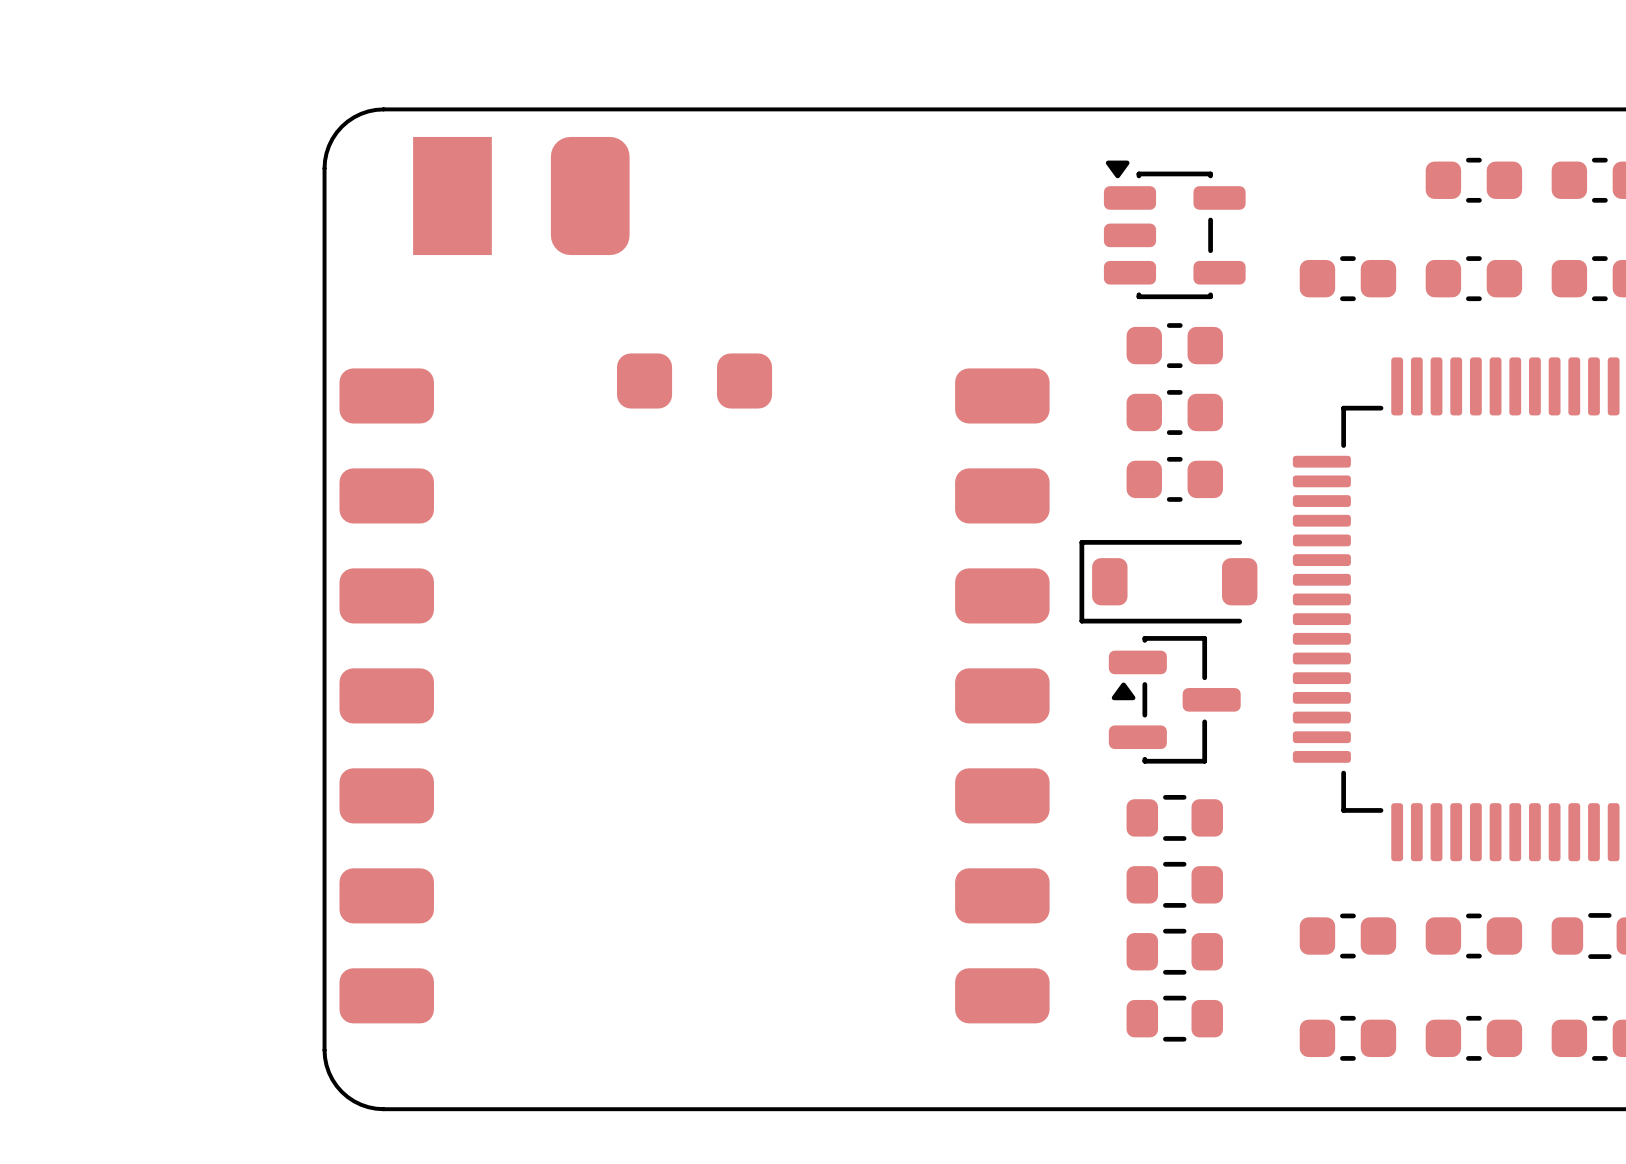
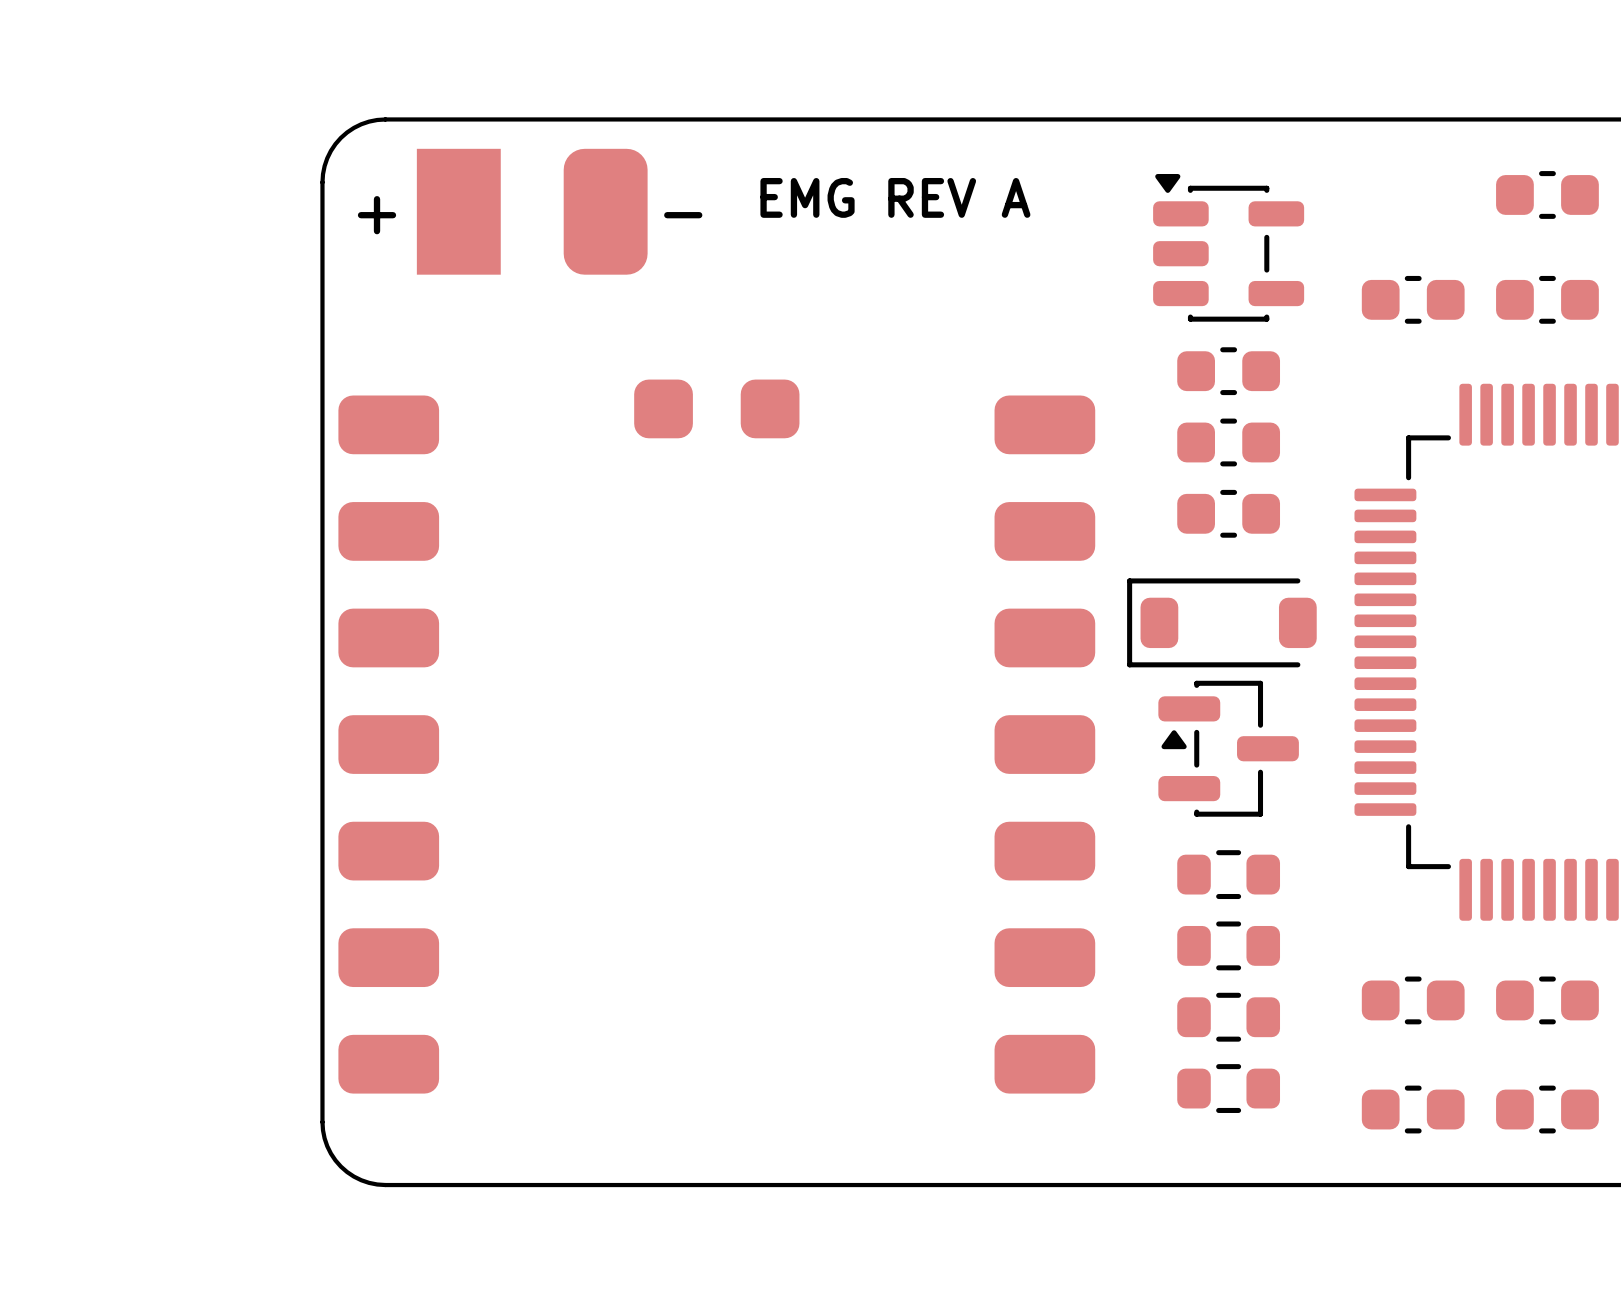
text: none -> EMG REV A (895, 197)
text: none -> + (377, 215)
text: none -> - (683, 215)

